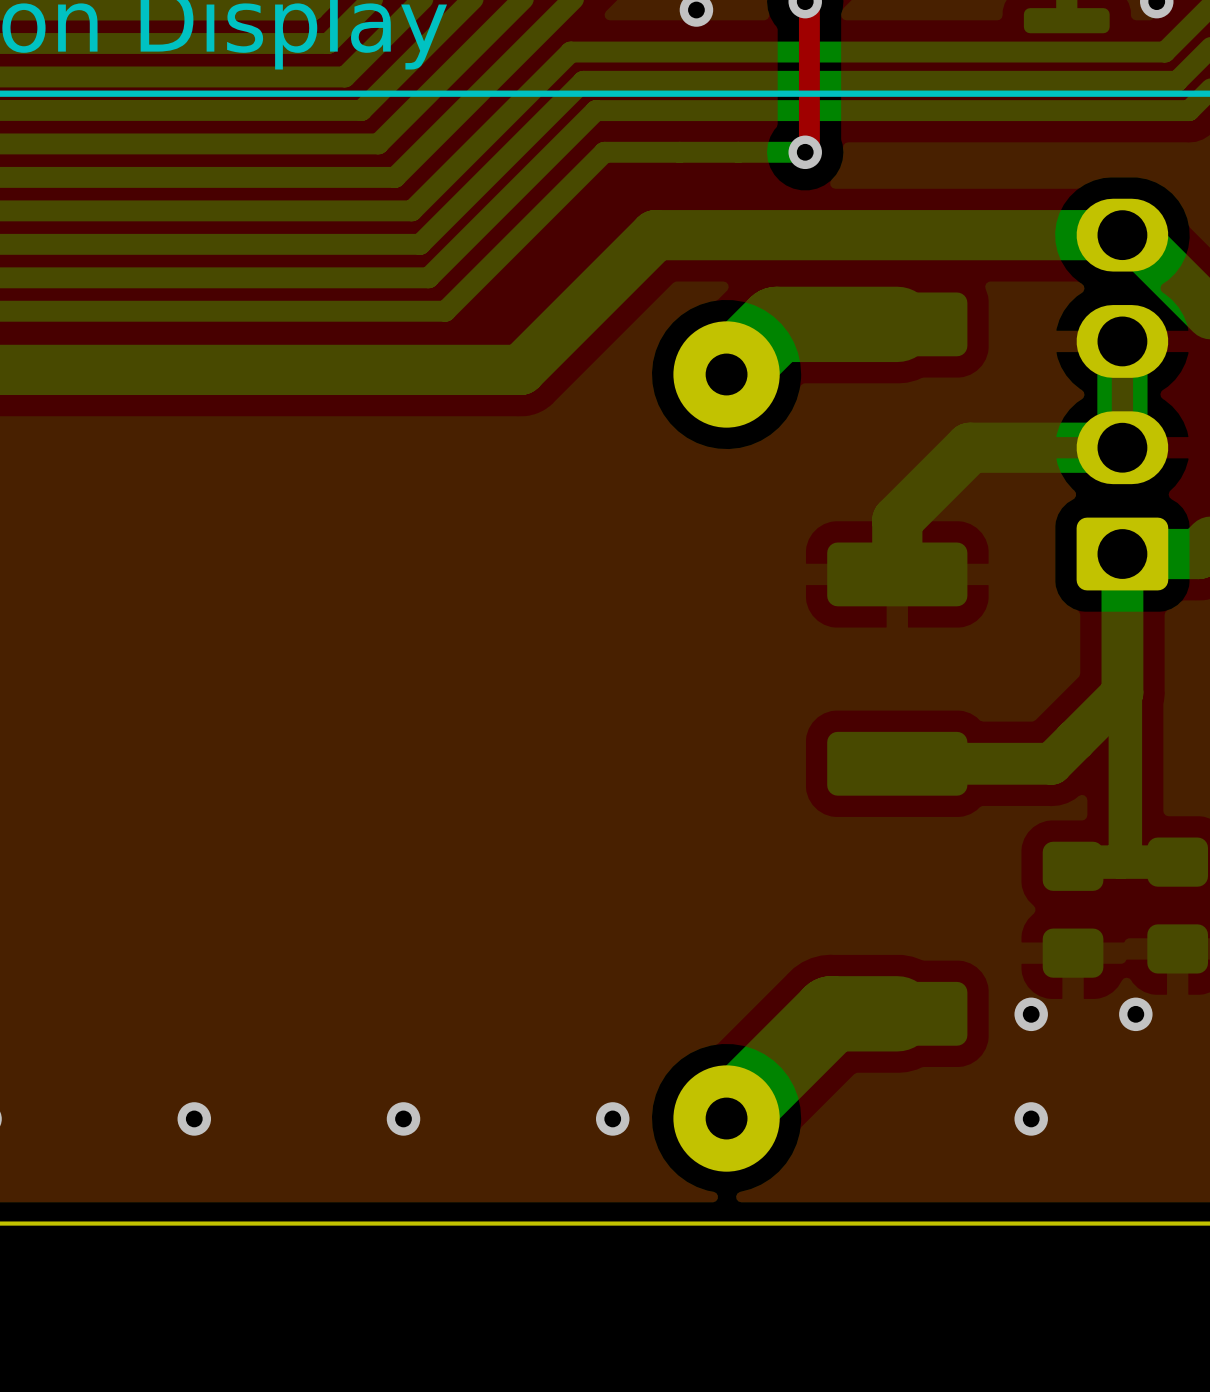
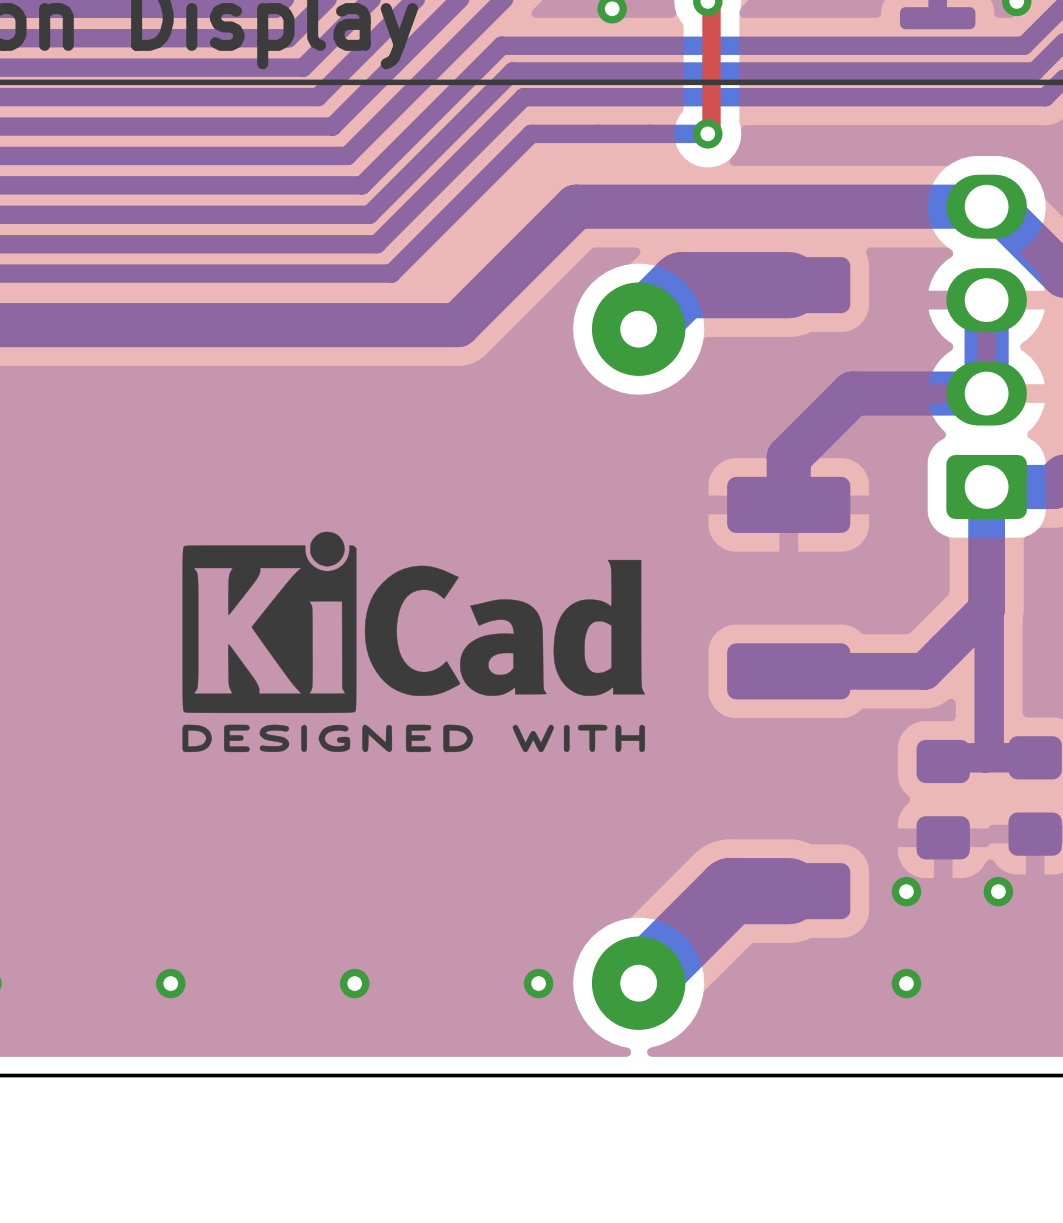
drawing: none -> [182, 531, 646, 753]

